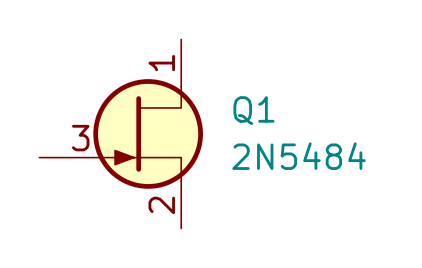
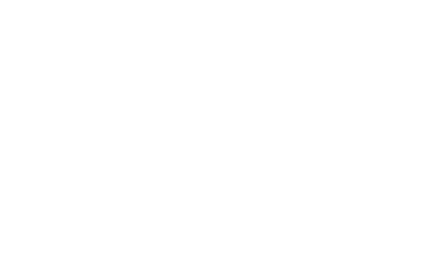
Q1: 2N5484 (121, 133) -> none

